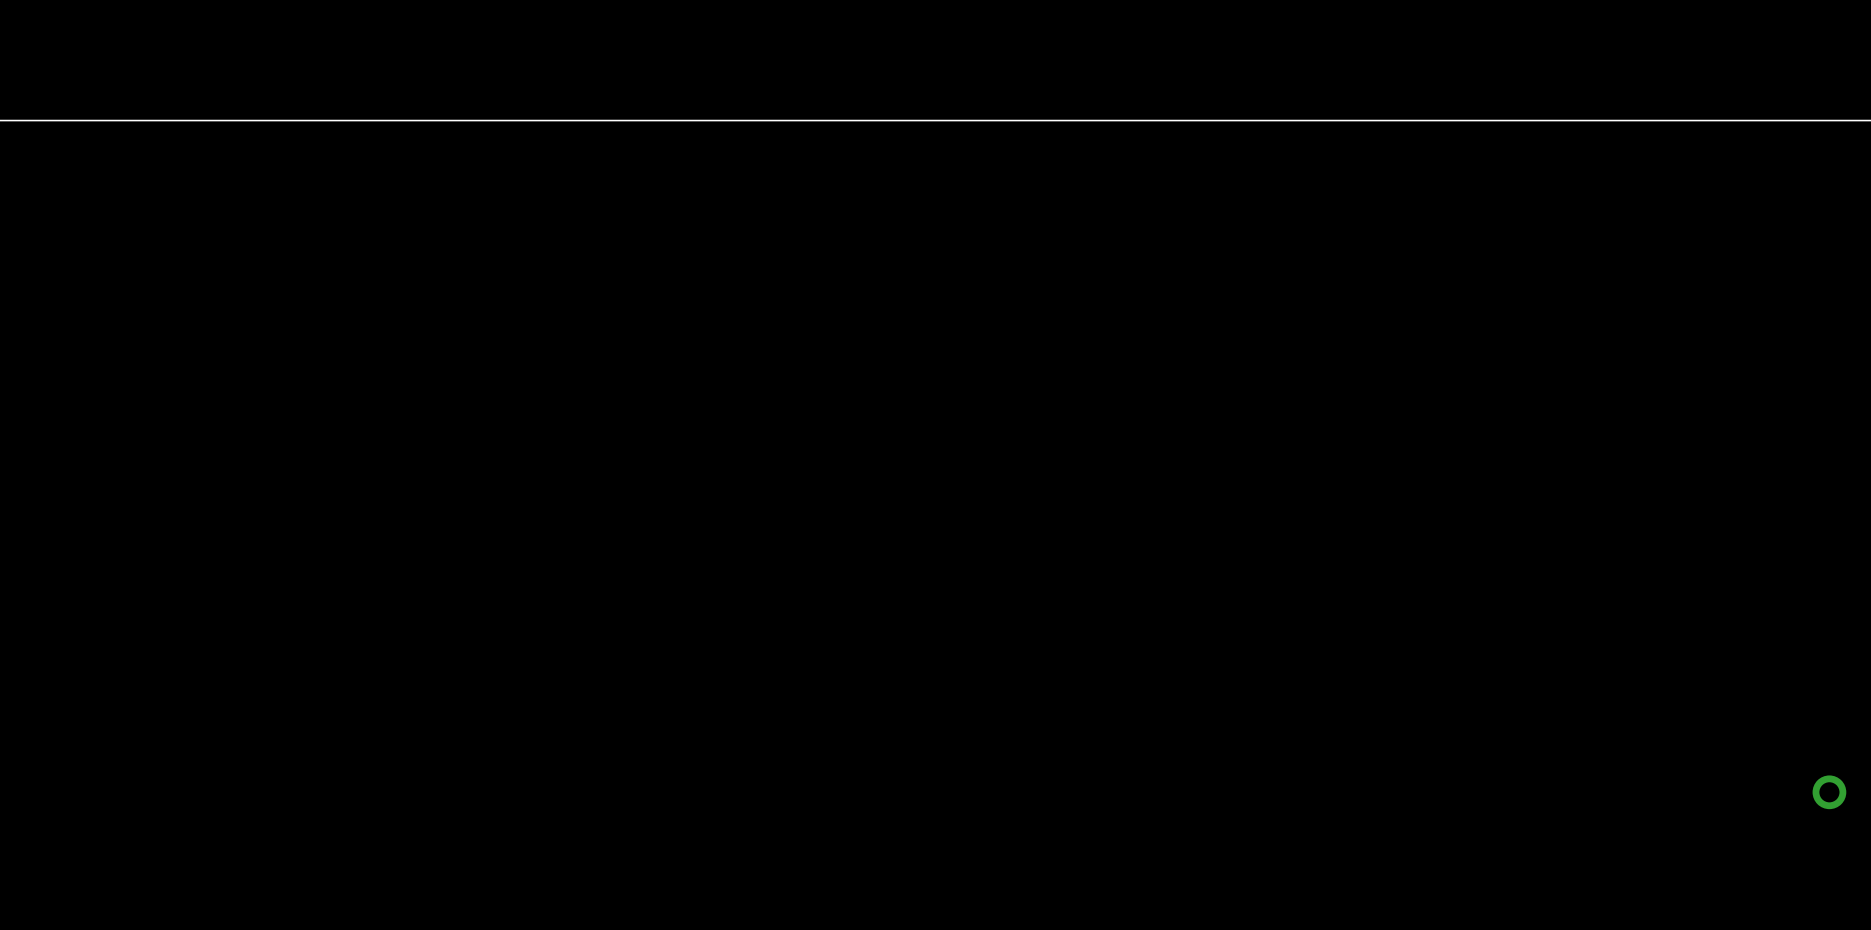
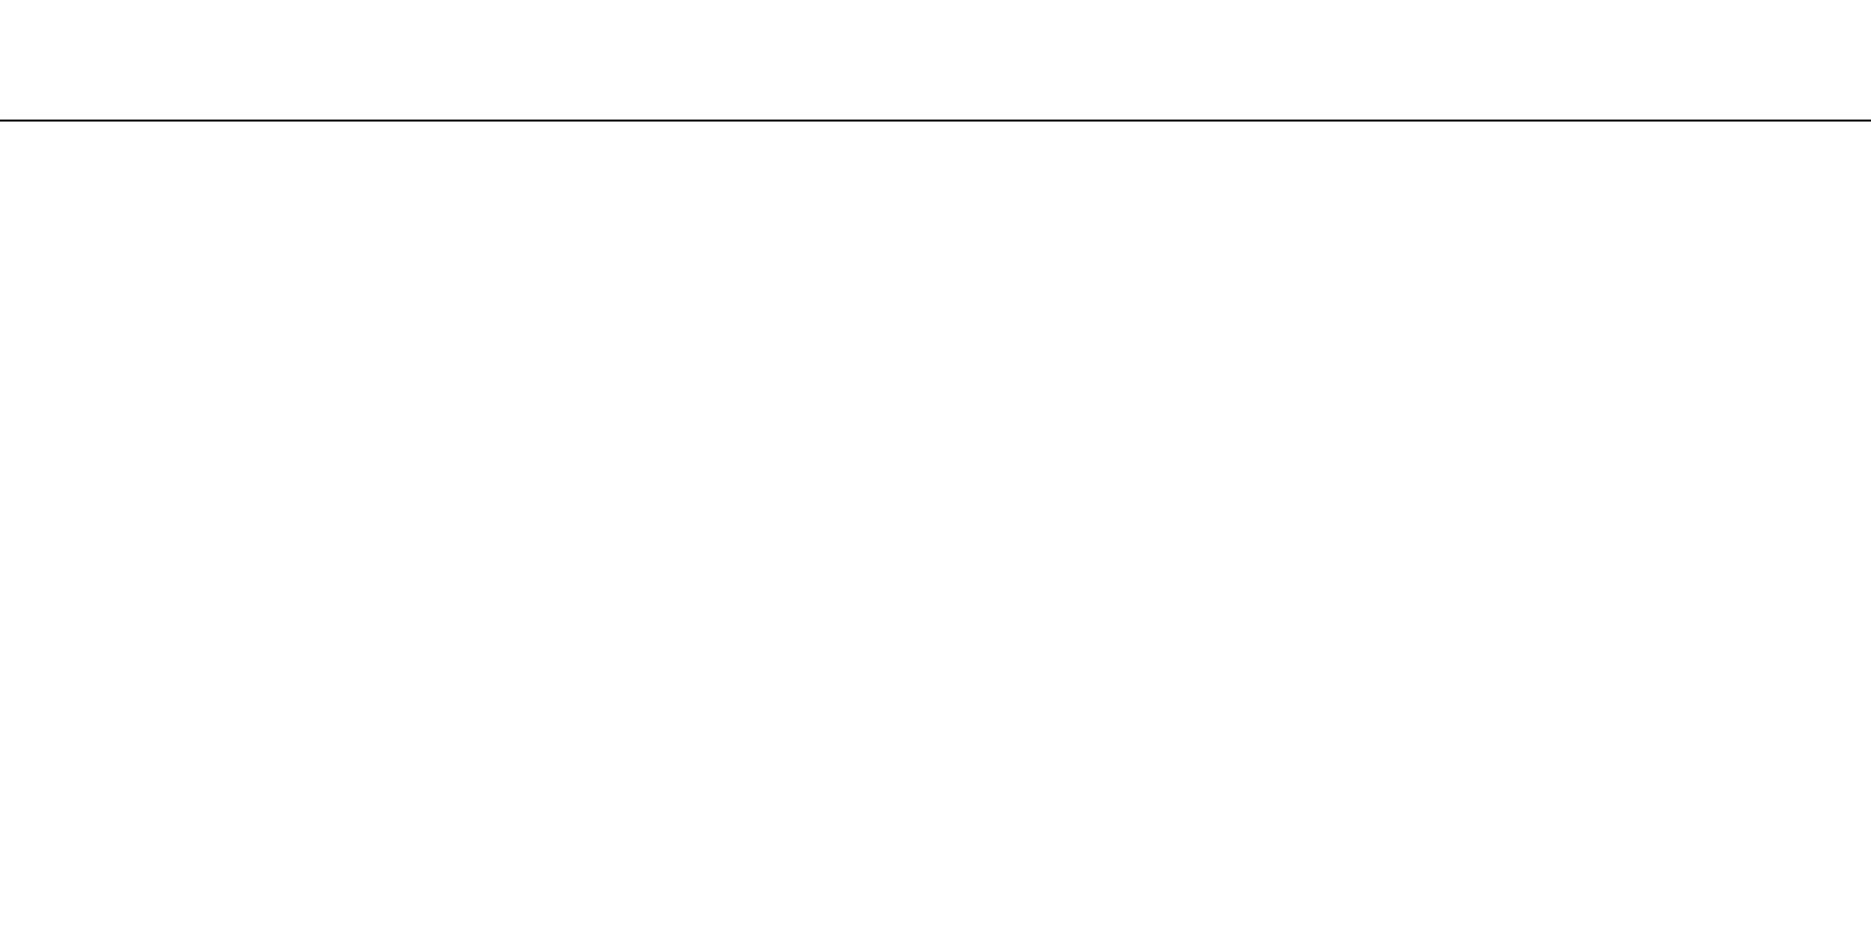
via: (1829, 792) -> none

